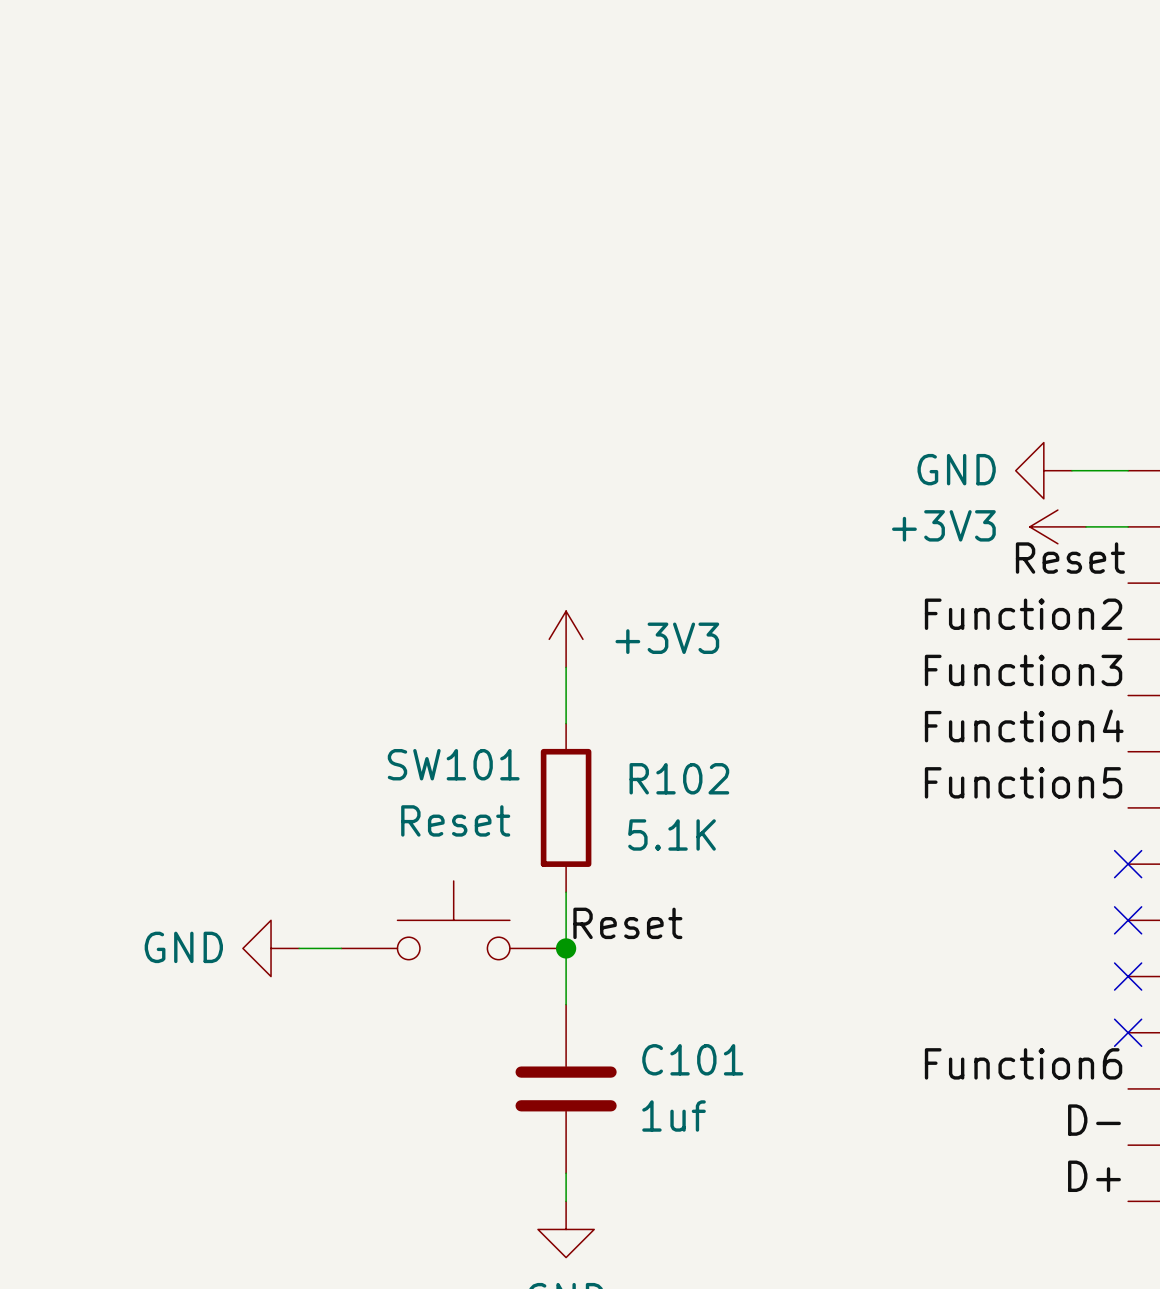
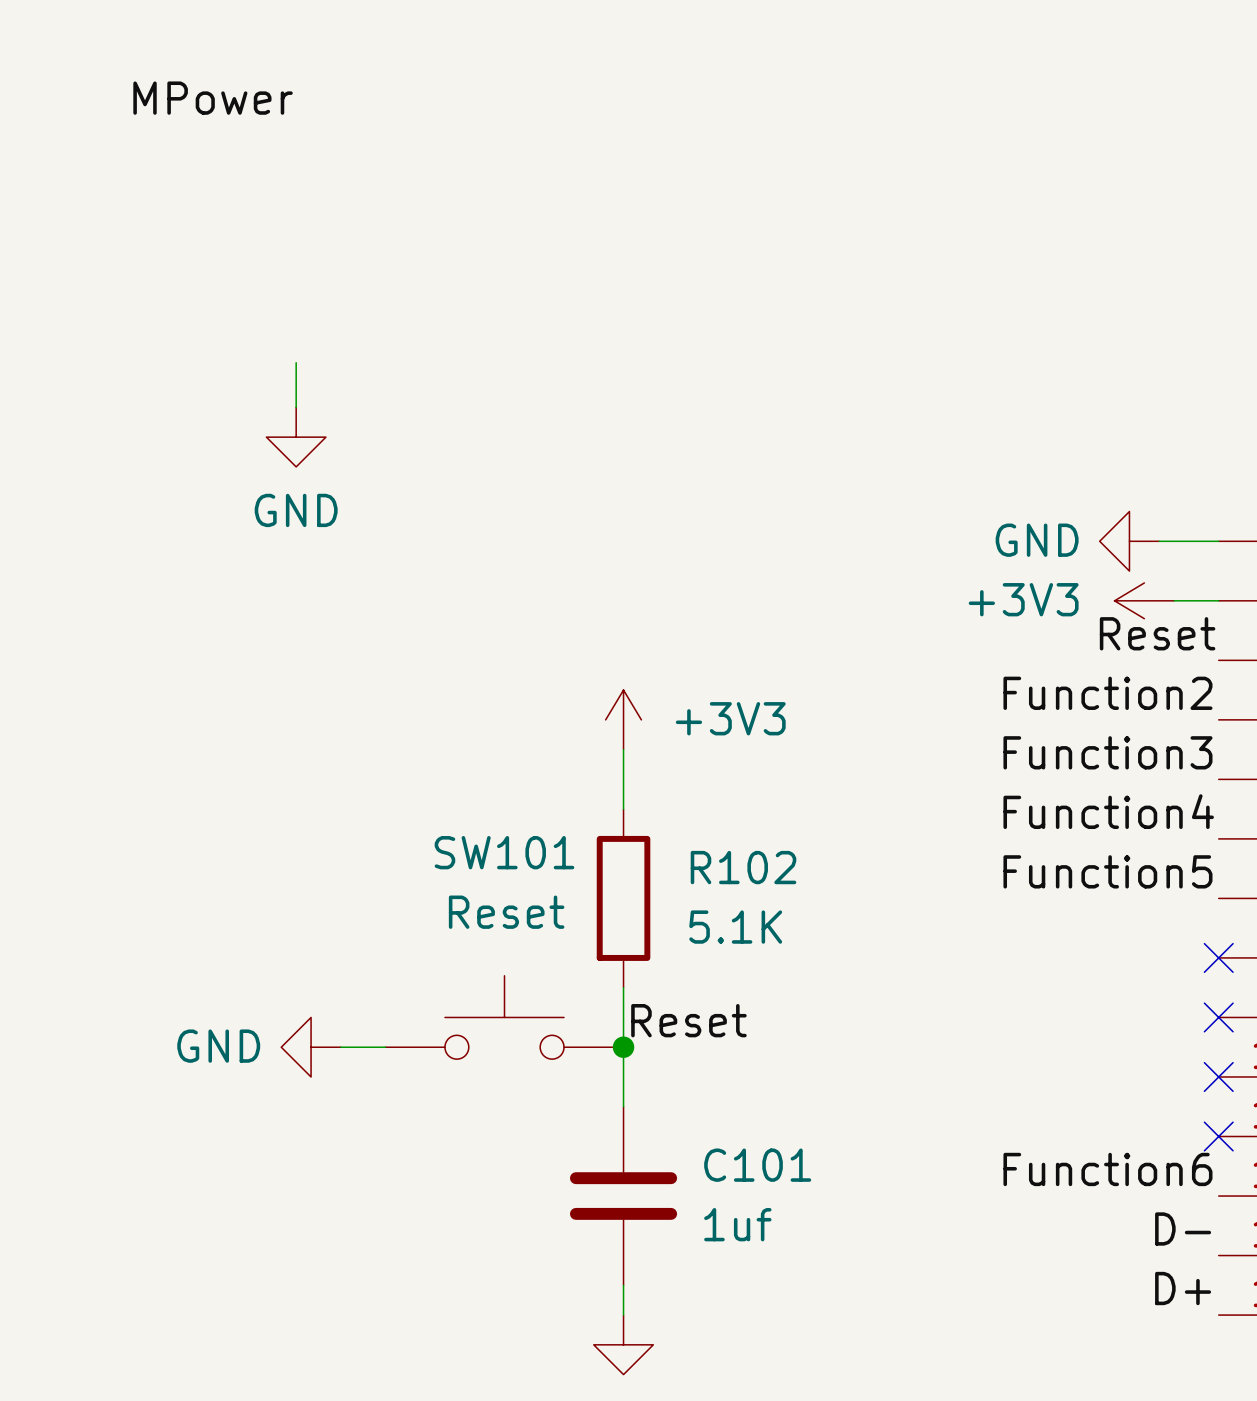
label: none -> MPower (213, 98)
wire: none -> (296, 362) (296, 407)
power symbol: none -> GND (296, 437)

